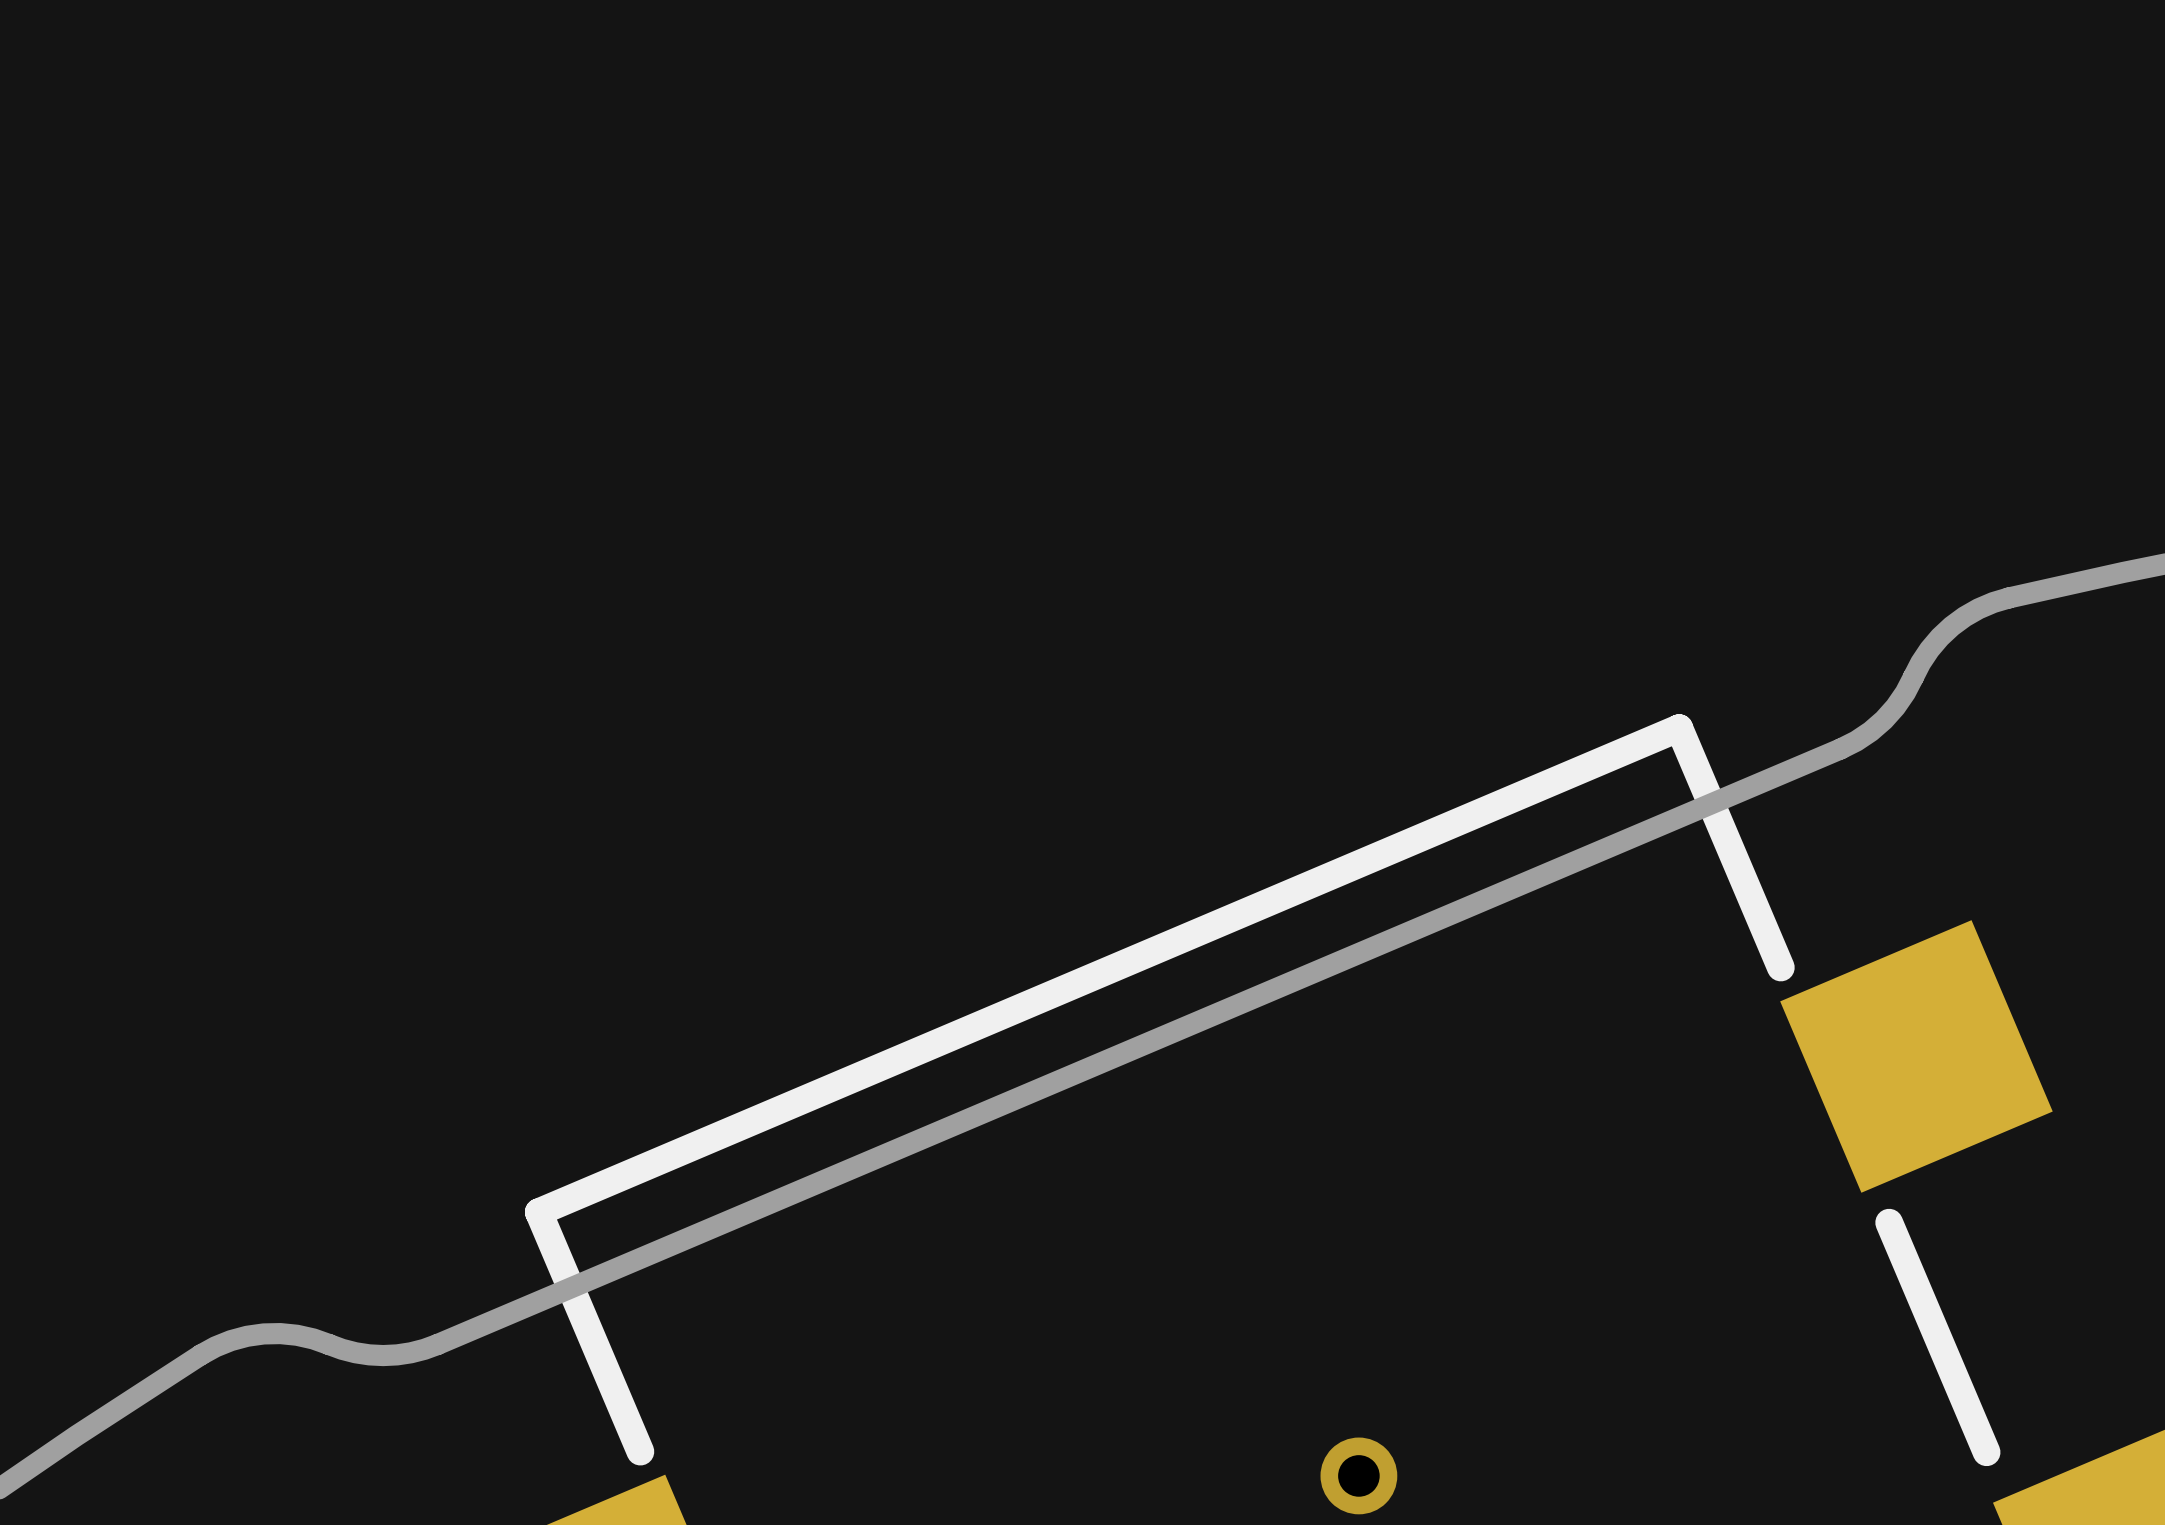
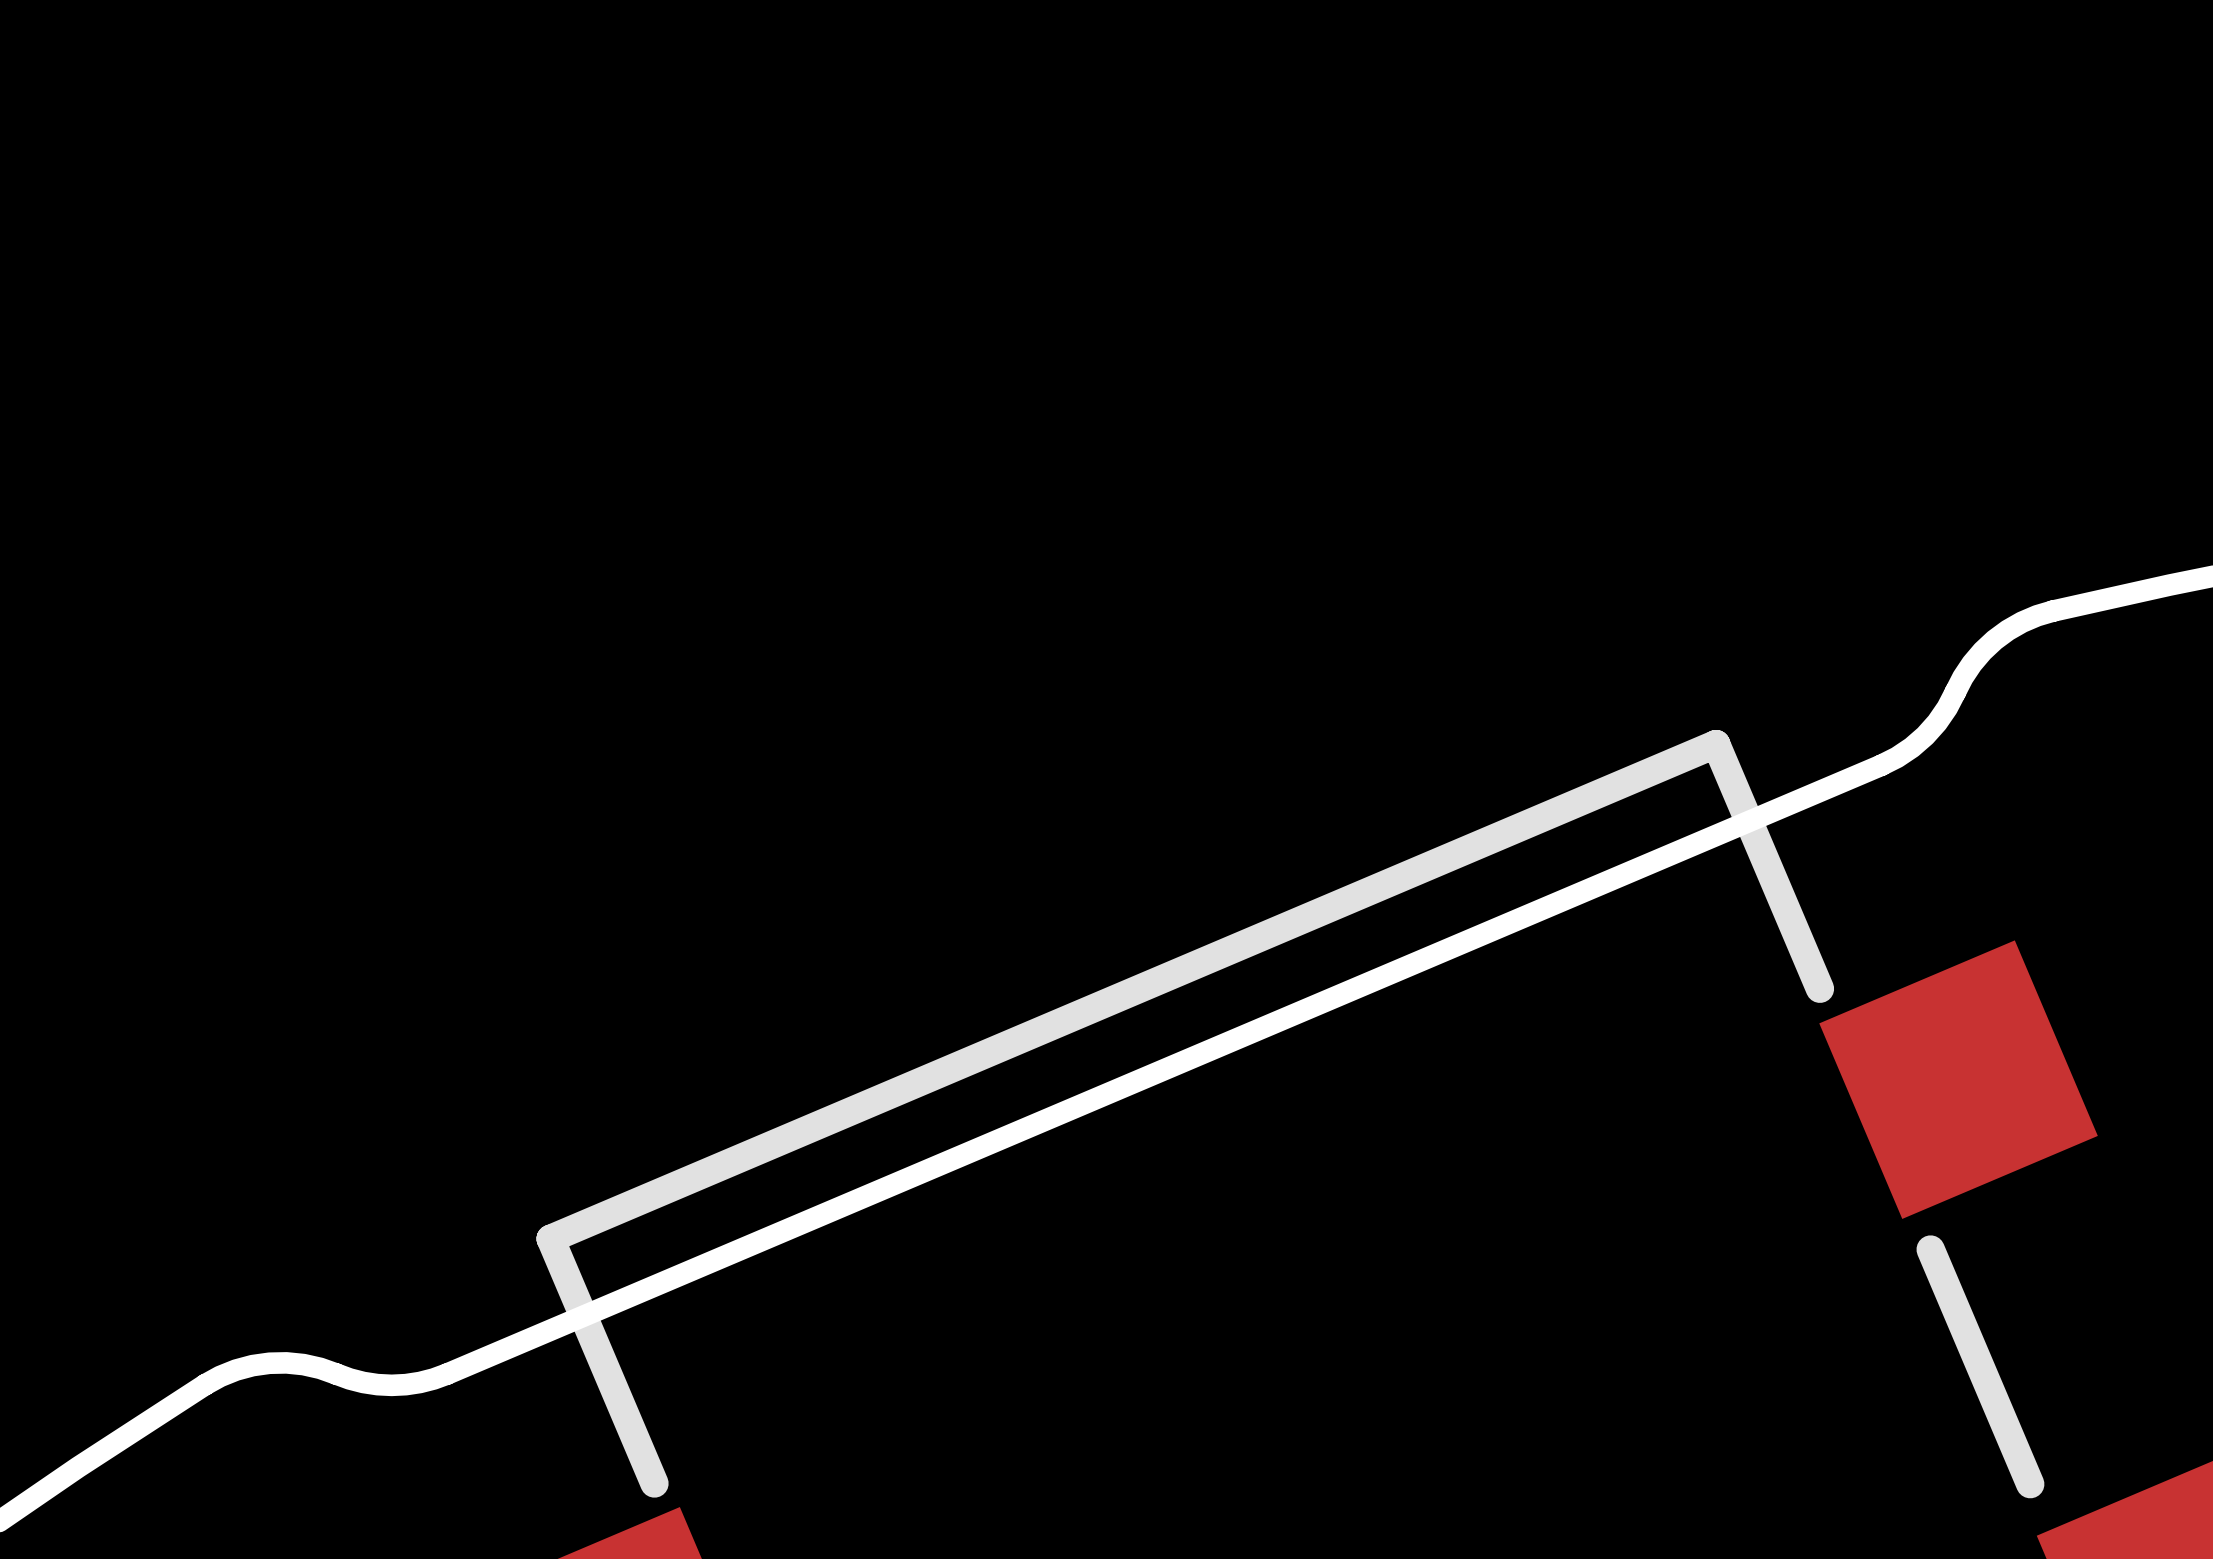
via: (1358, 1475) -> none

